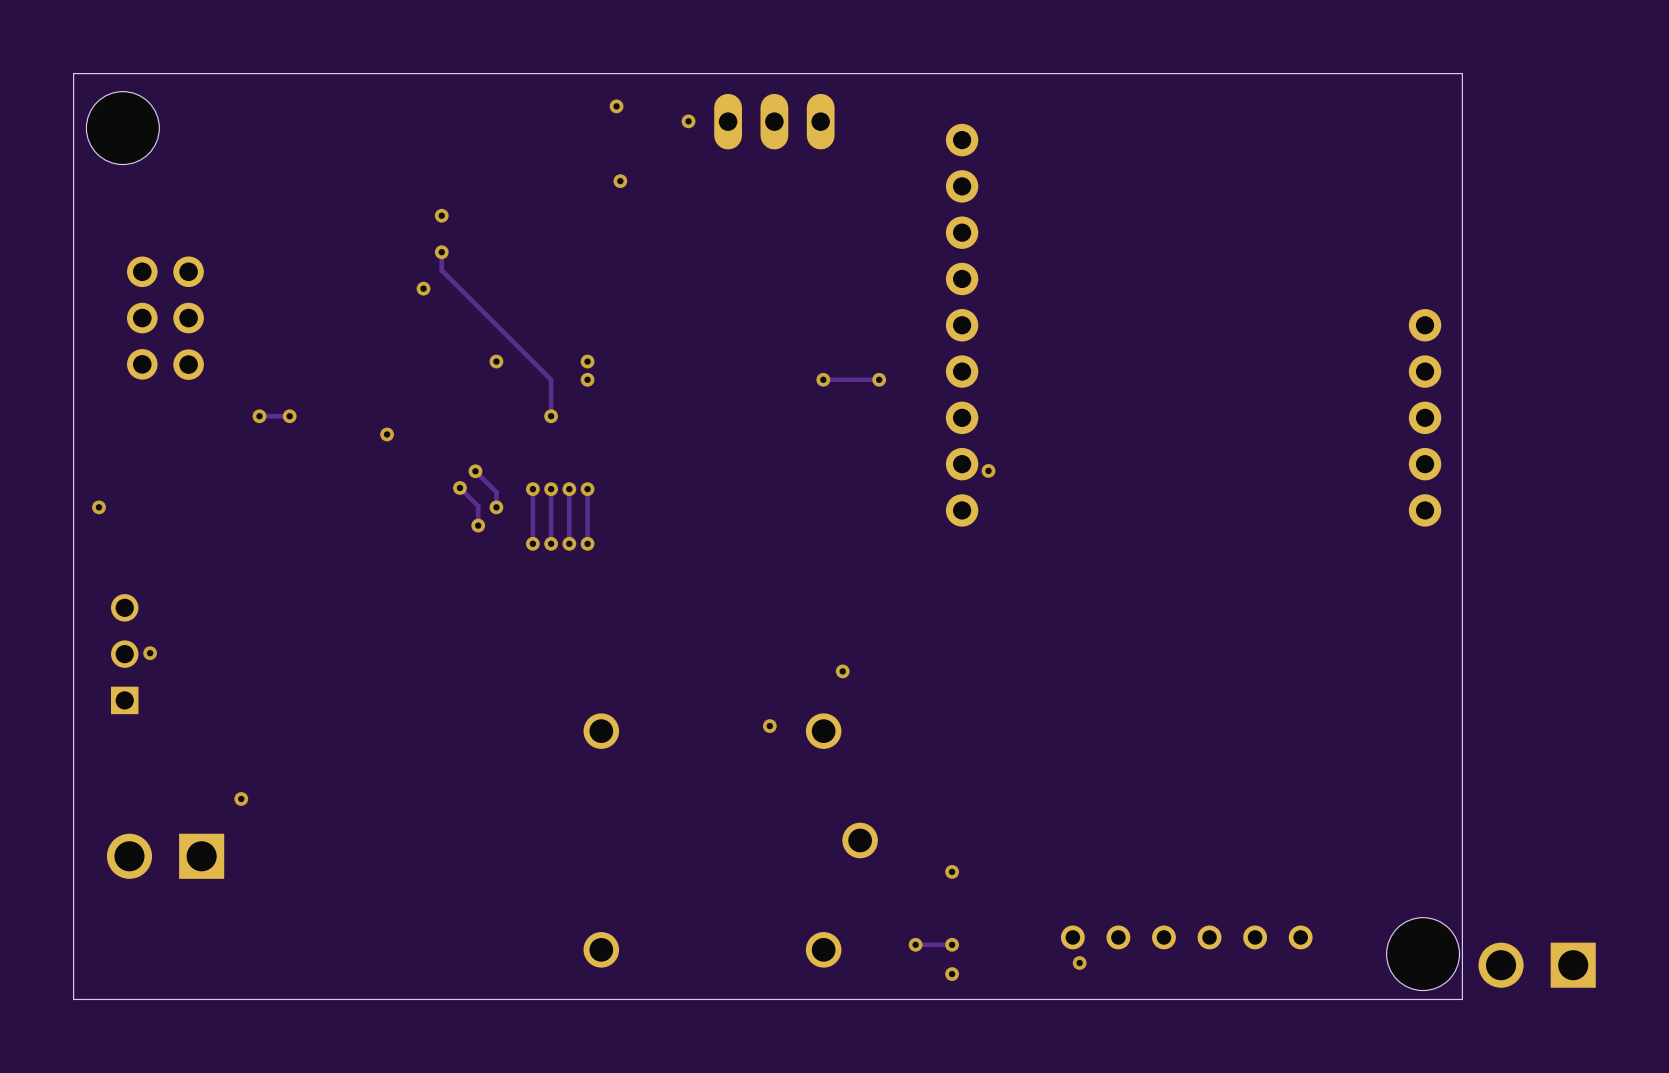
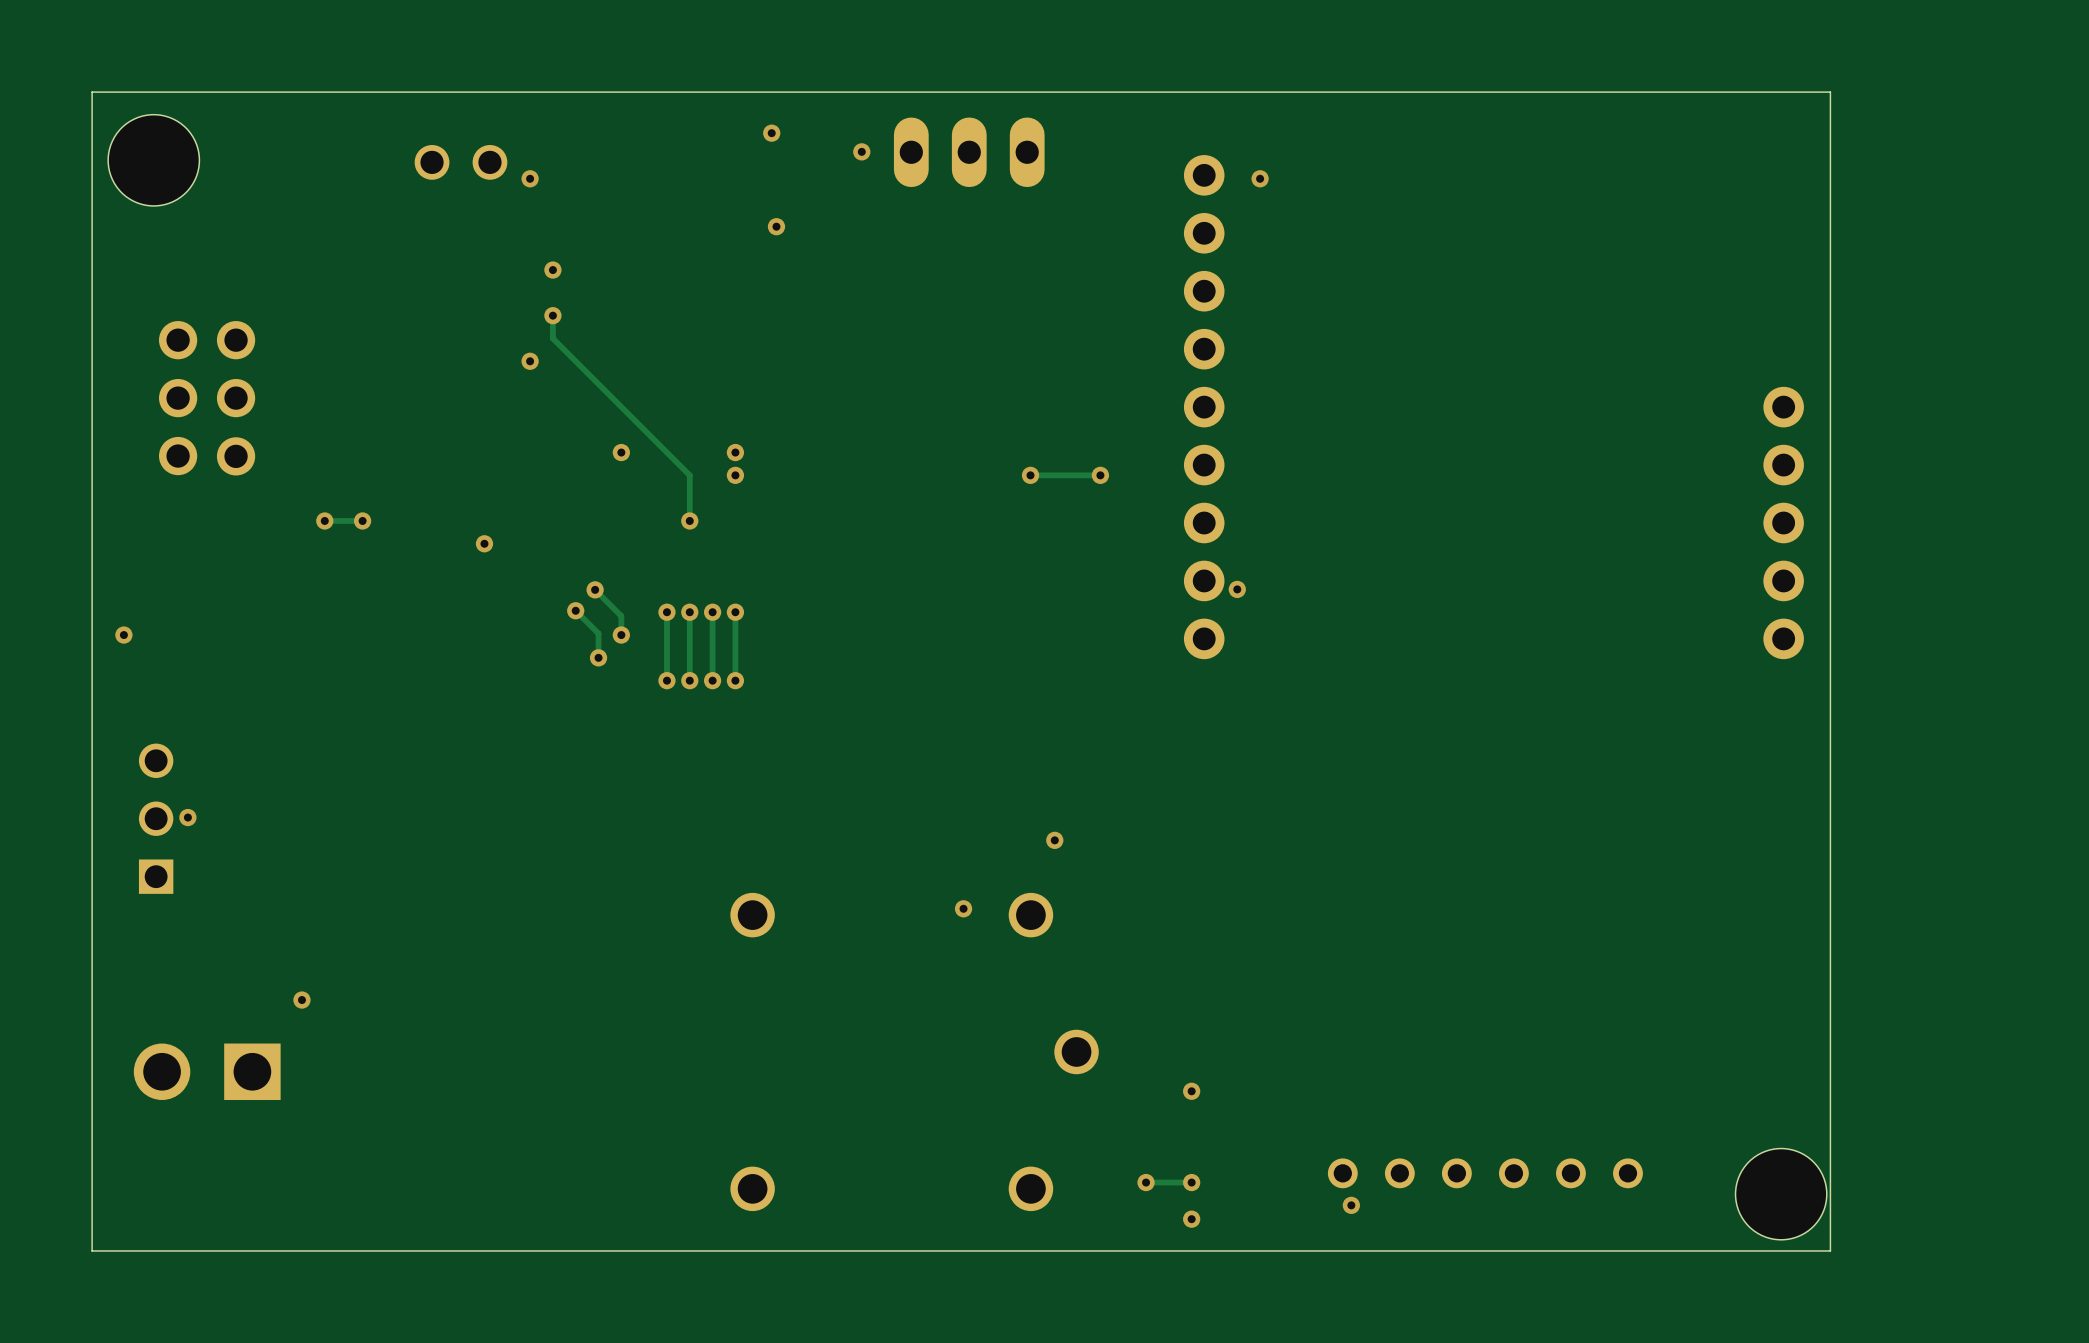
part: none -> (461, 162)
via: none -> (530, 178)
via: none -> (1260, 178)
part: (1537, 965) -> none

